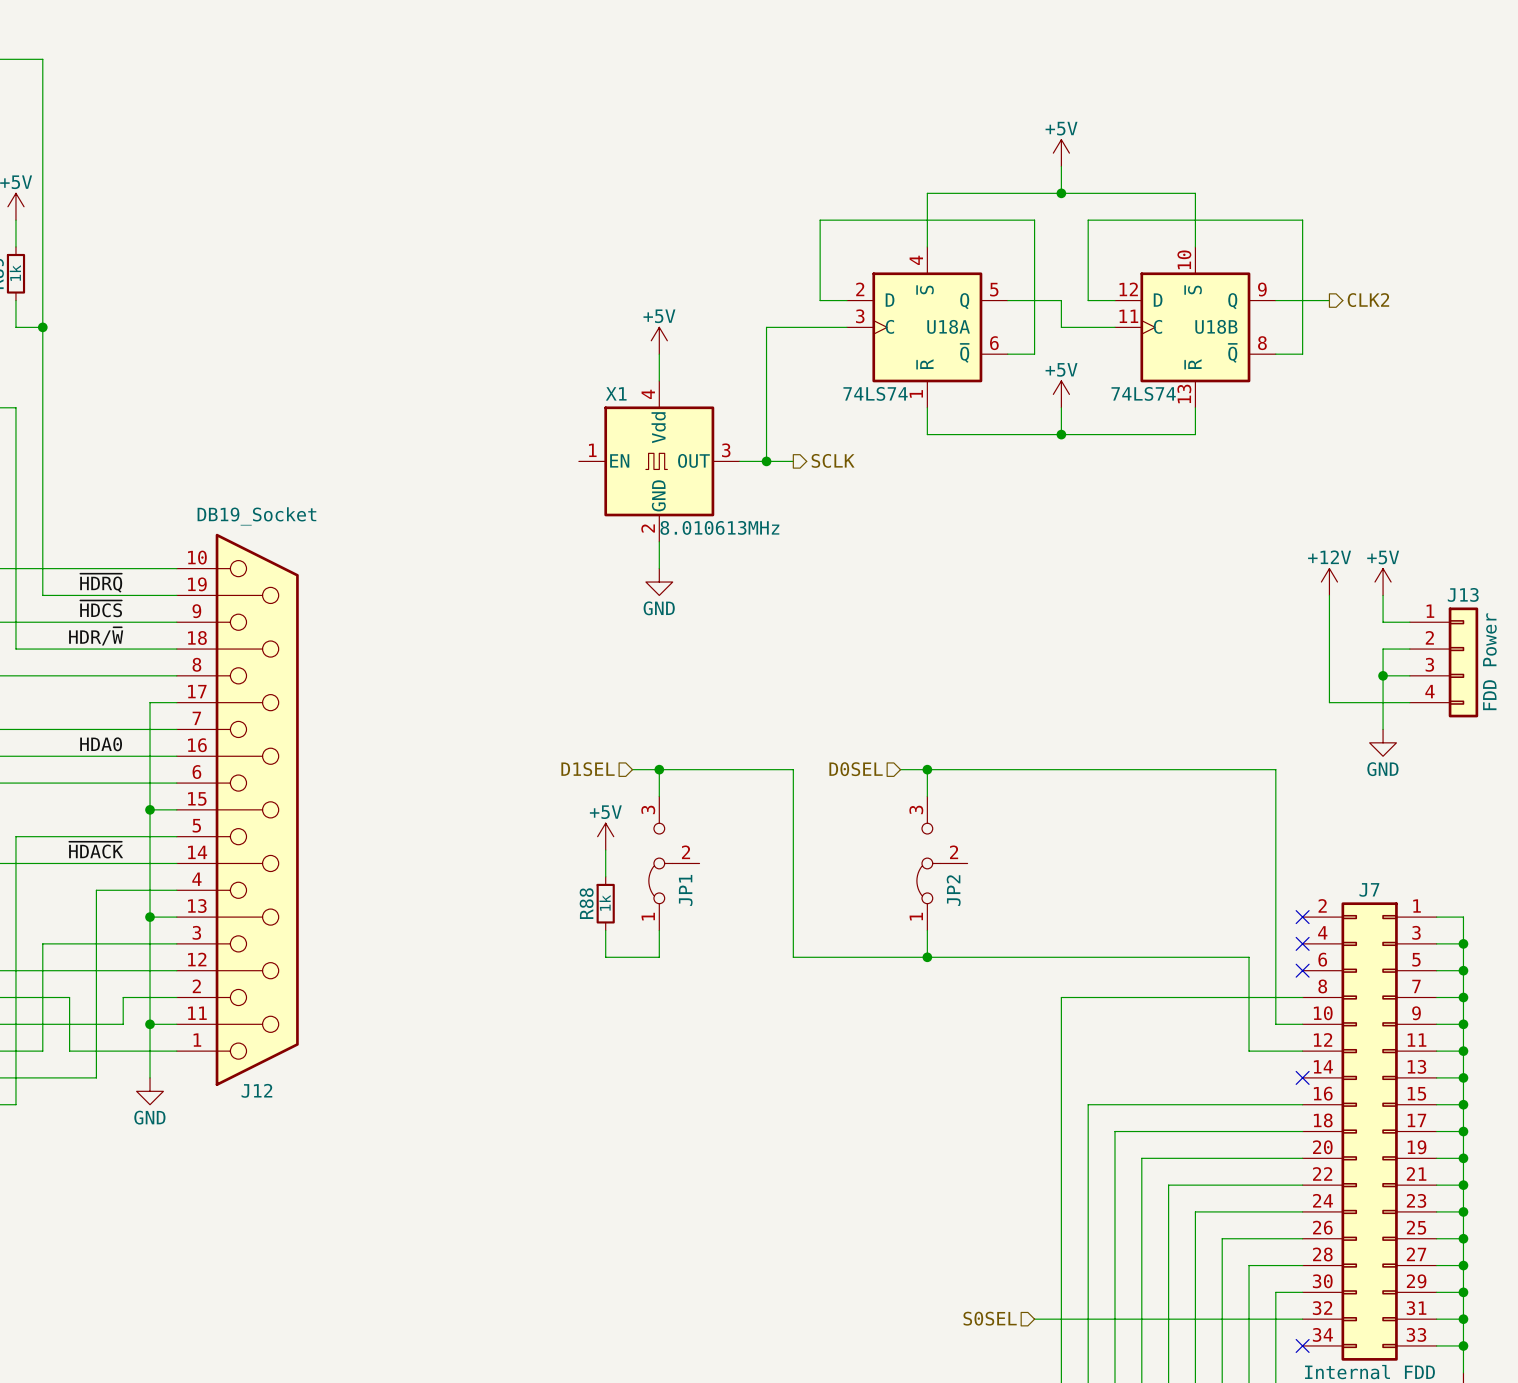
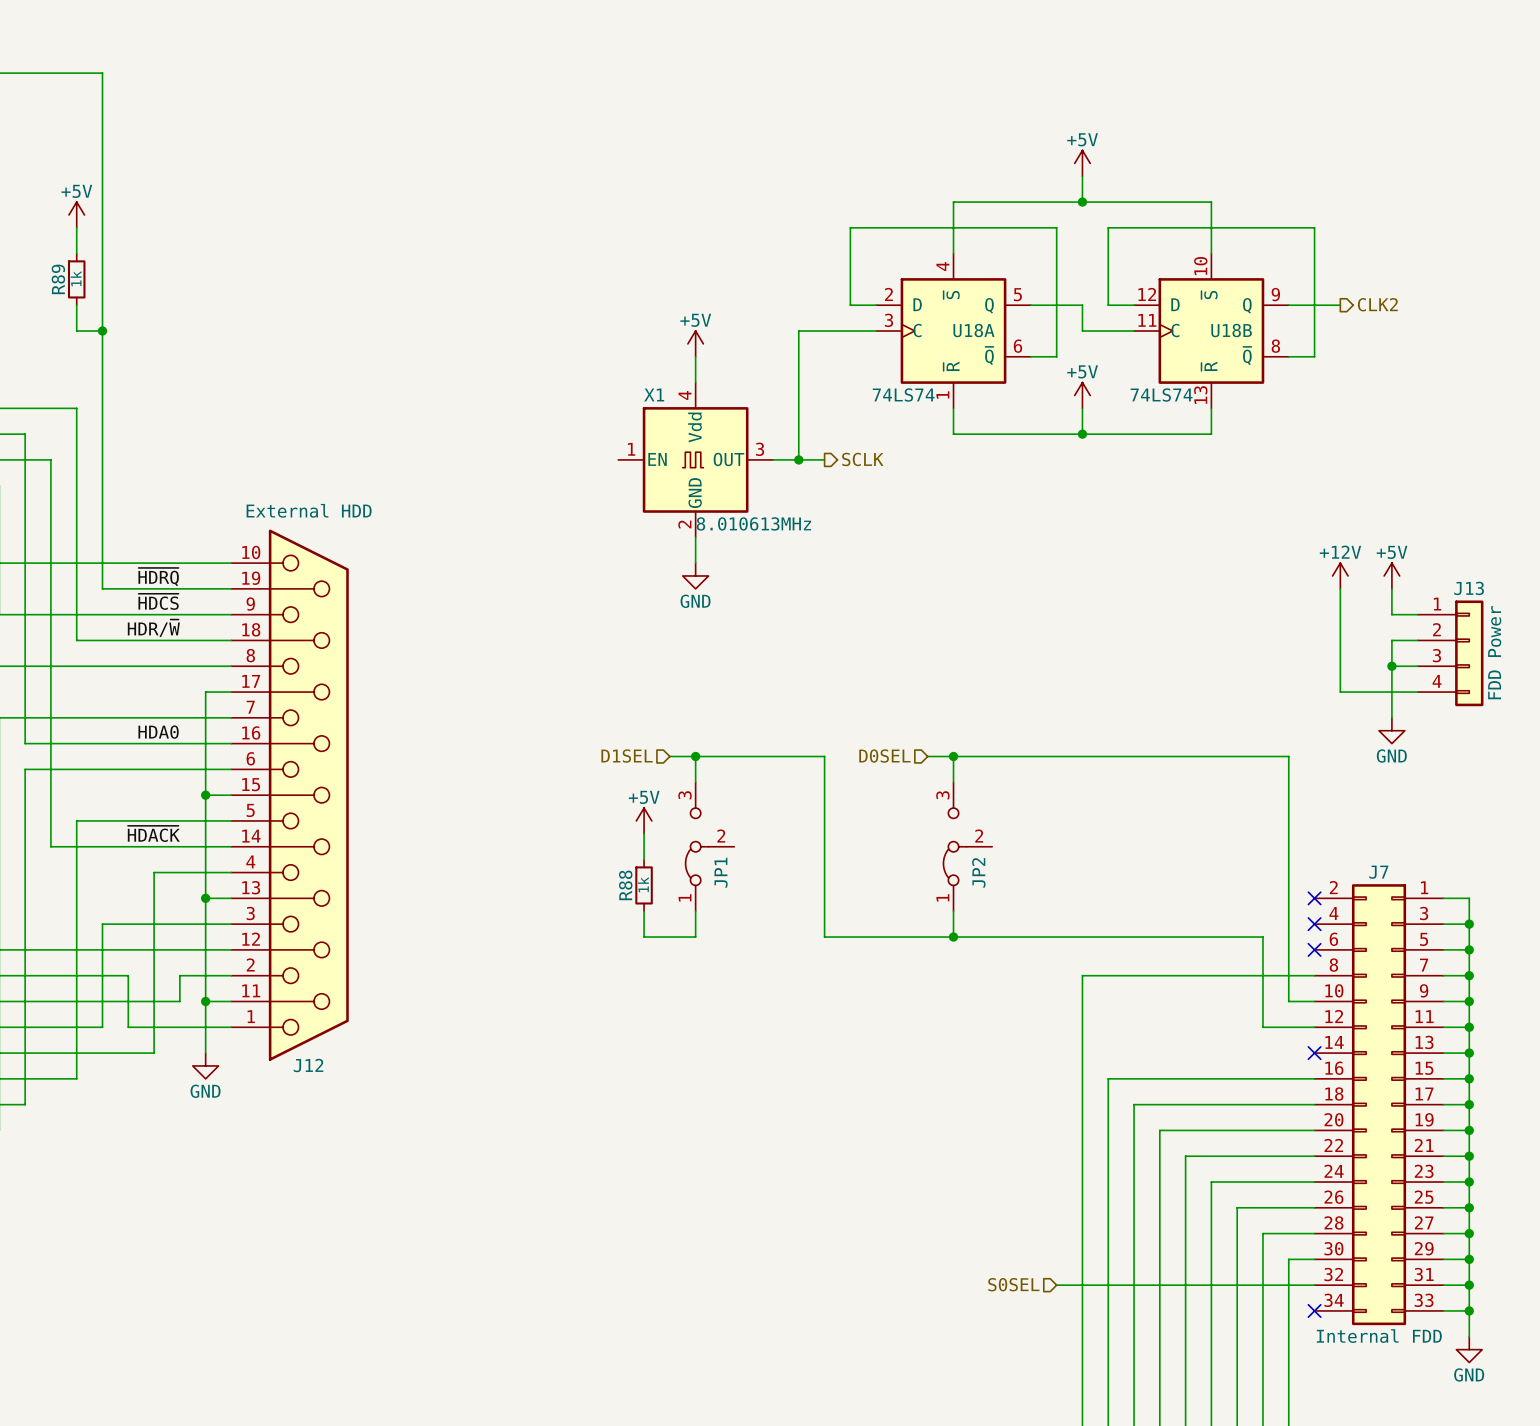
J12 value: DB19_Socket (256, 516) -> External HDD (309, 510)

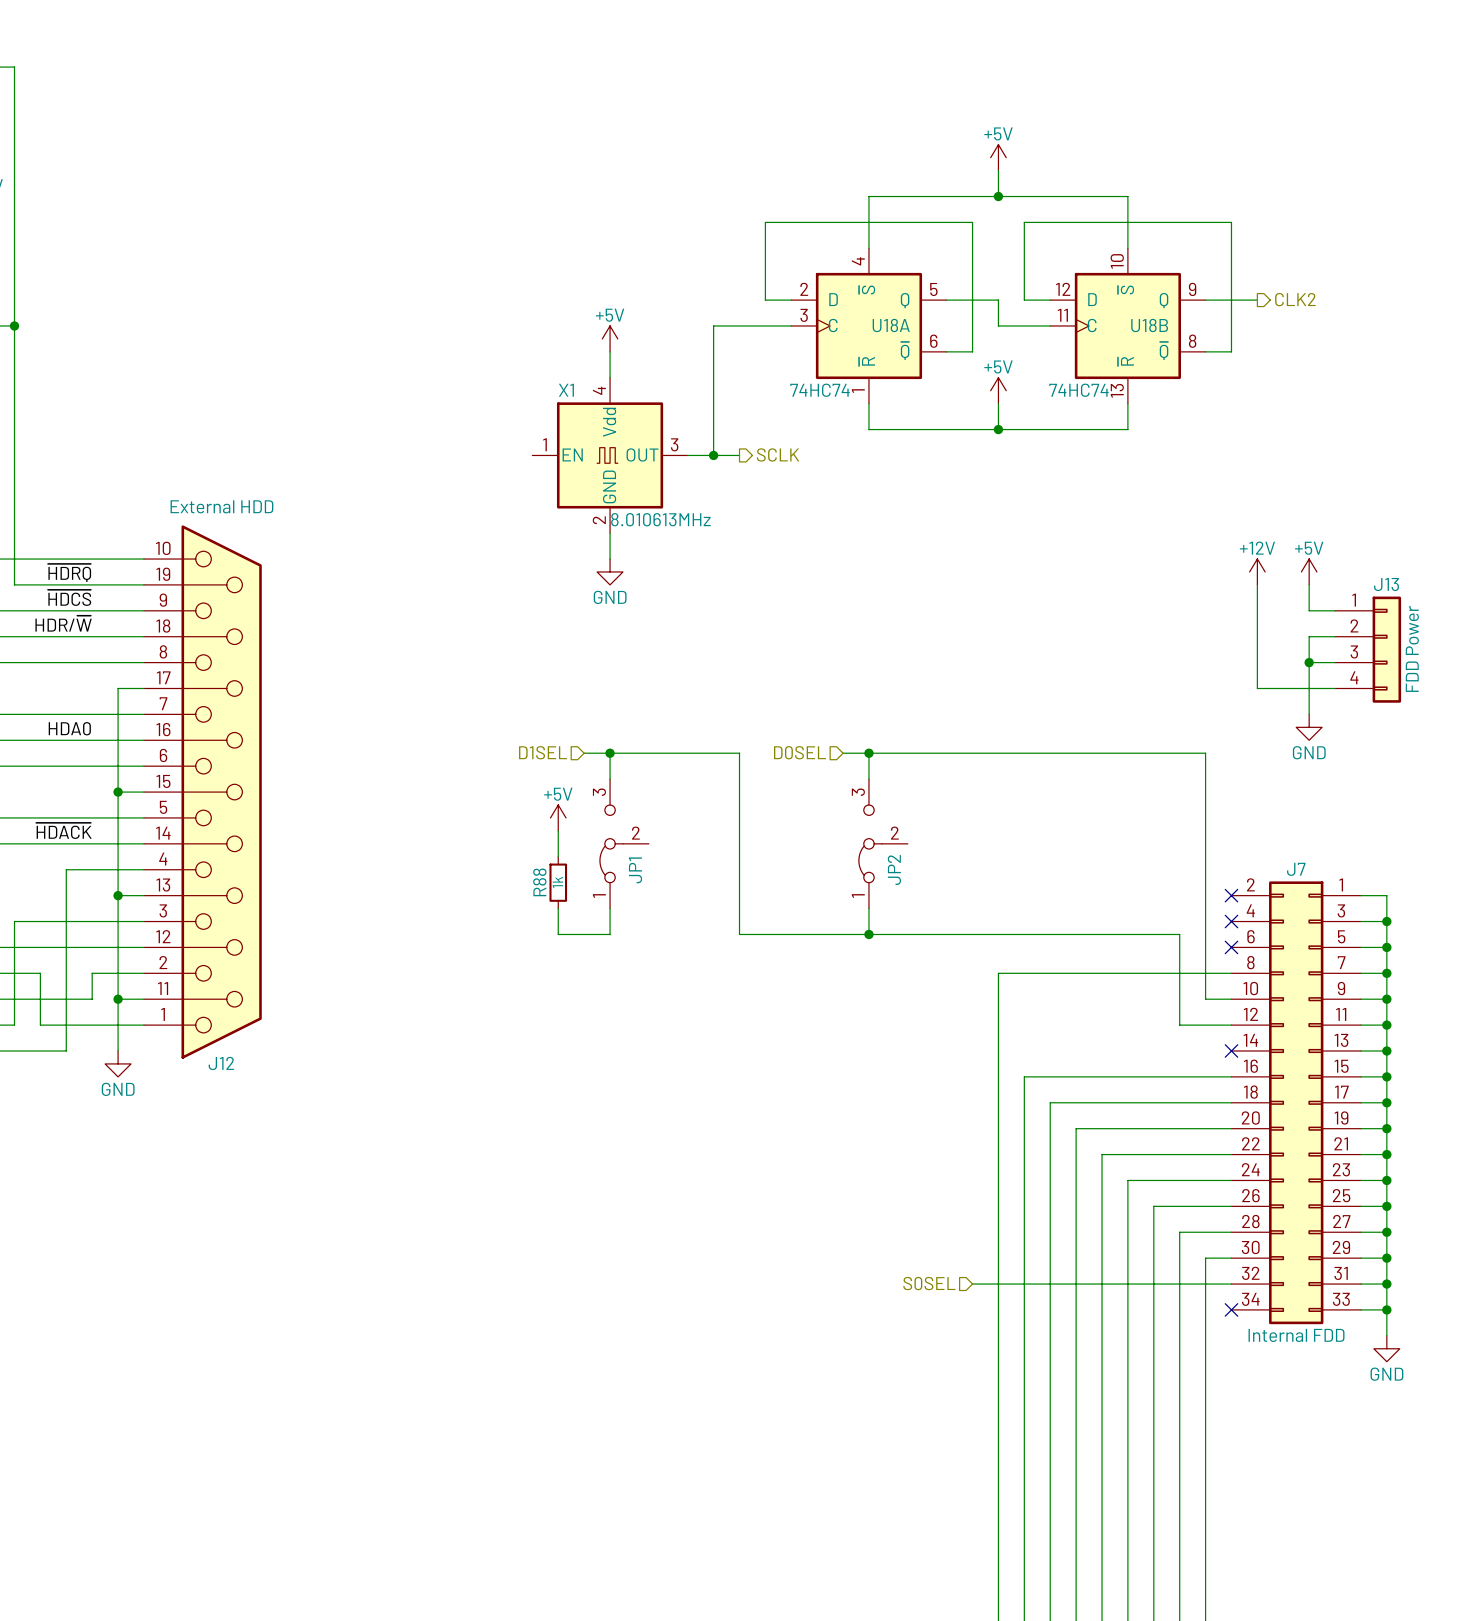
U18A value: 74LS74 (903, 394) -> 74HC74 (820, 390)
U18B value: 74LS74 (1161, 394) -> 74HC74 (1078, 390)

